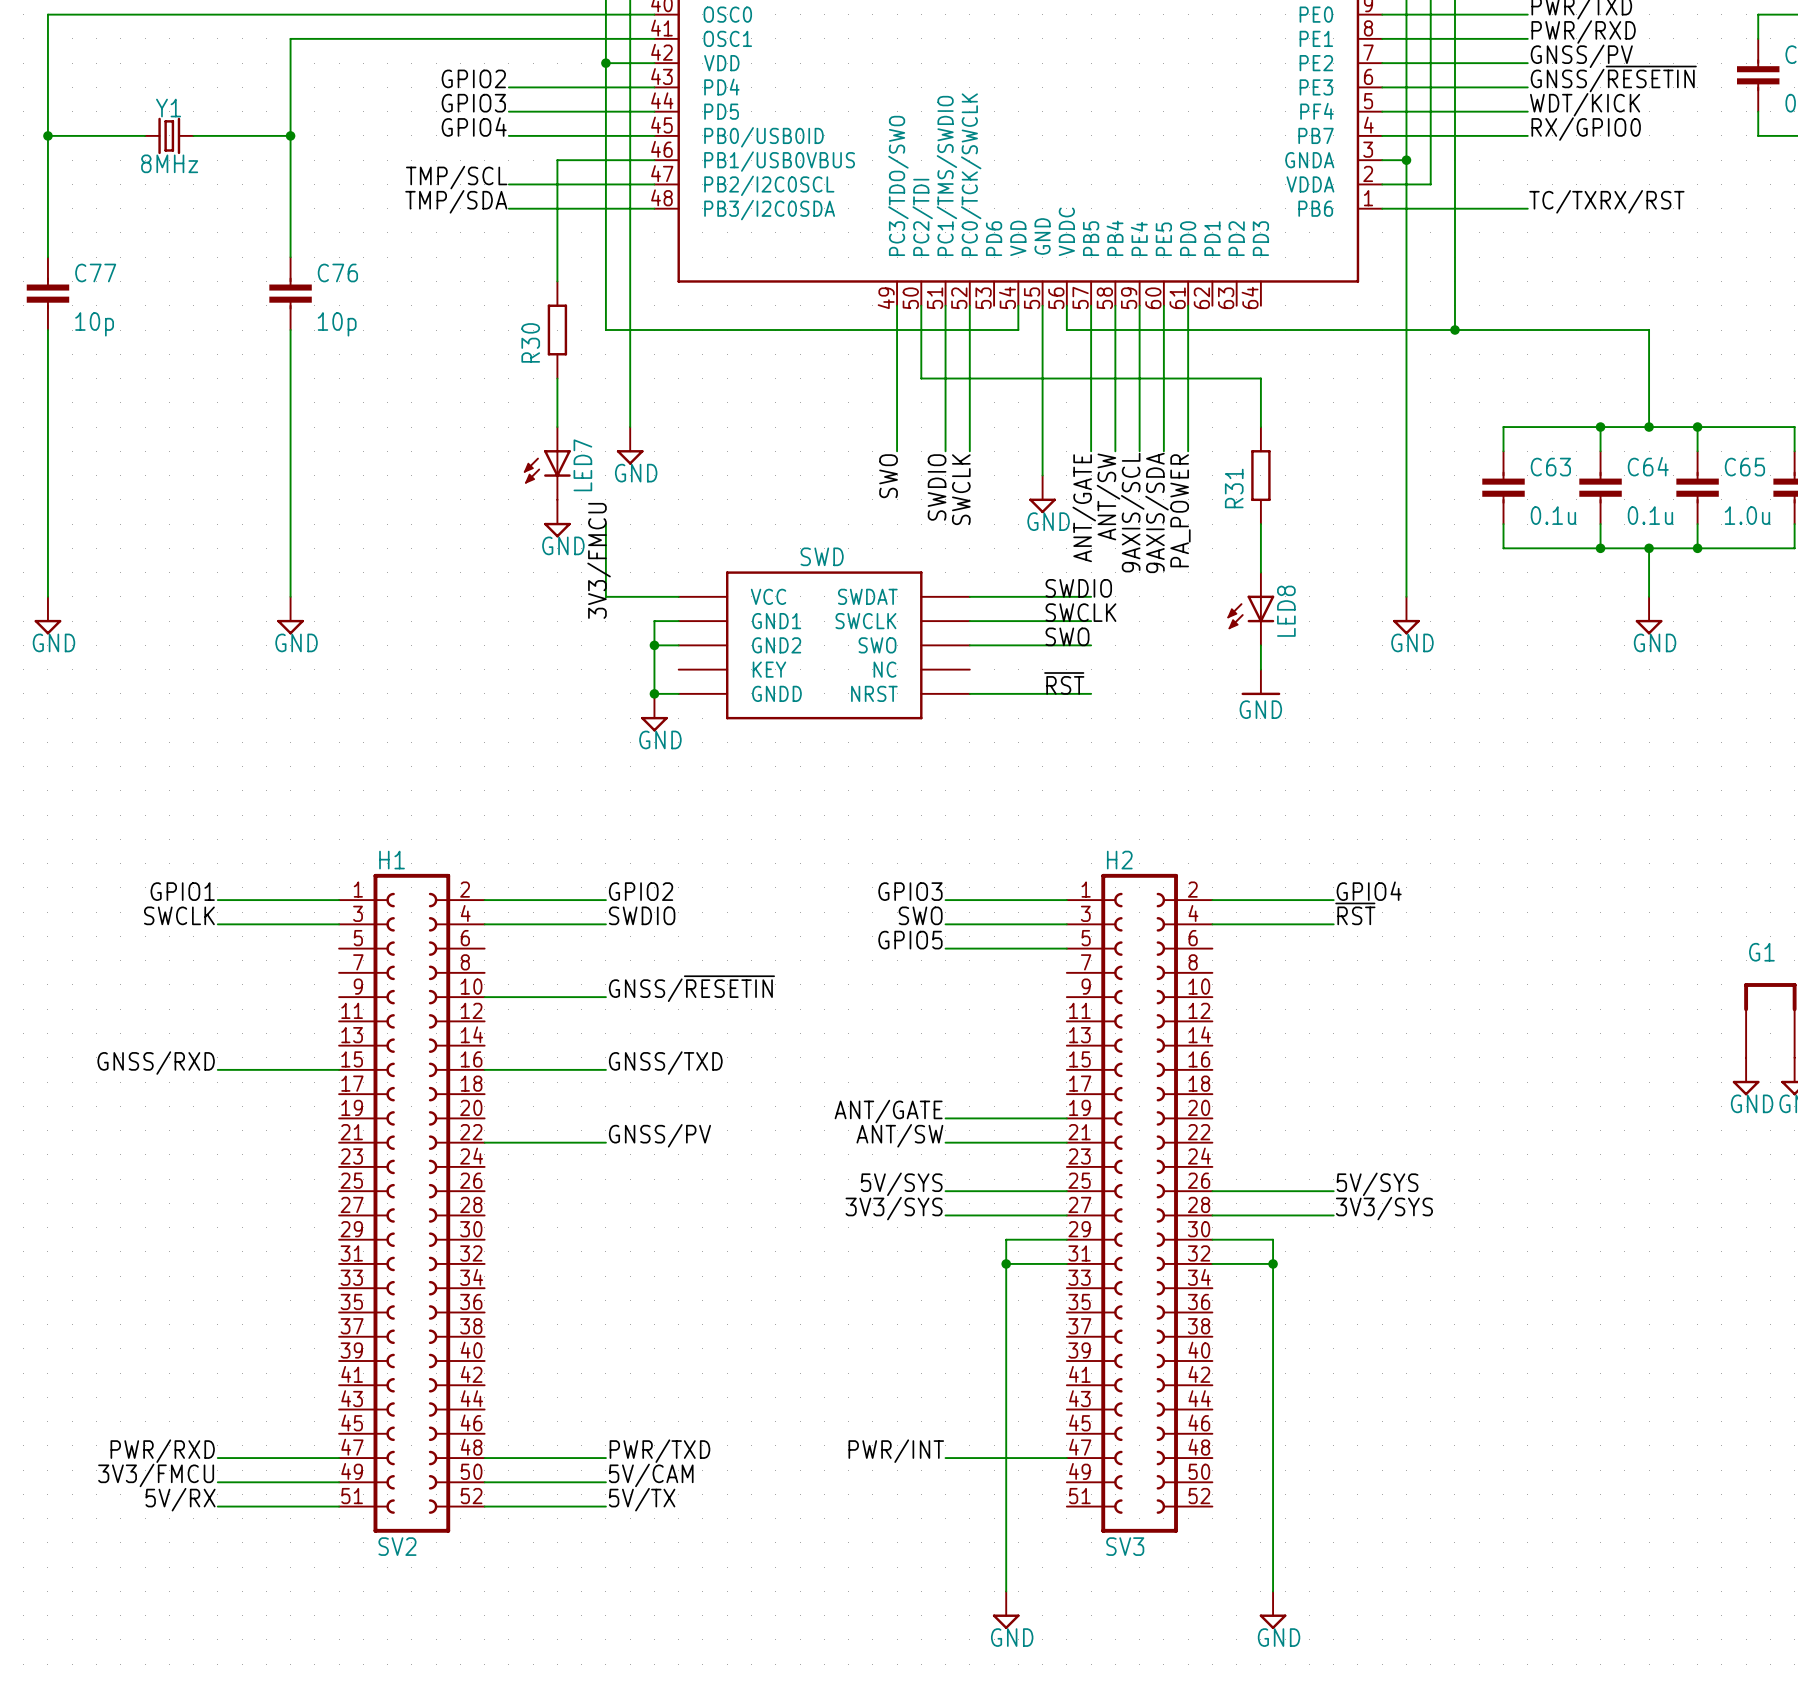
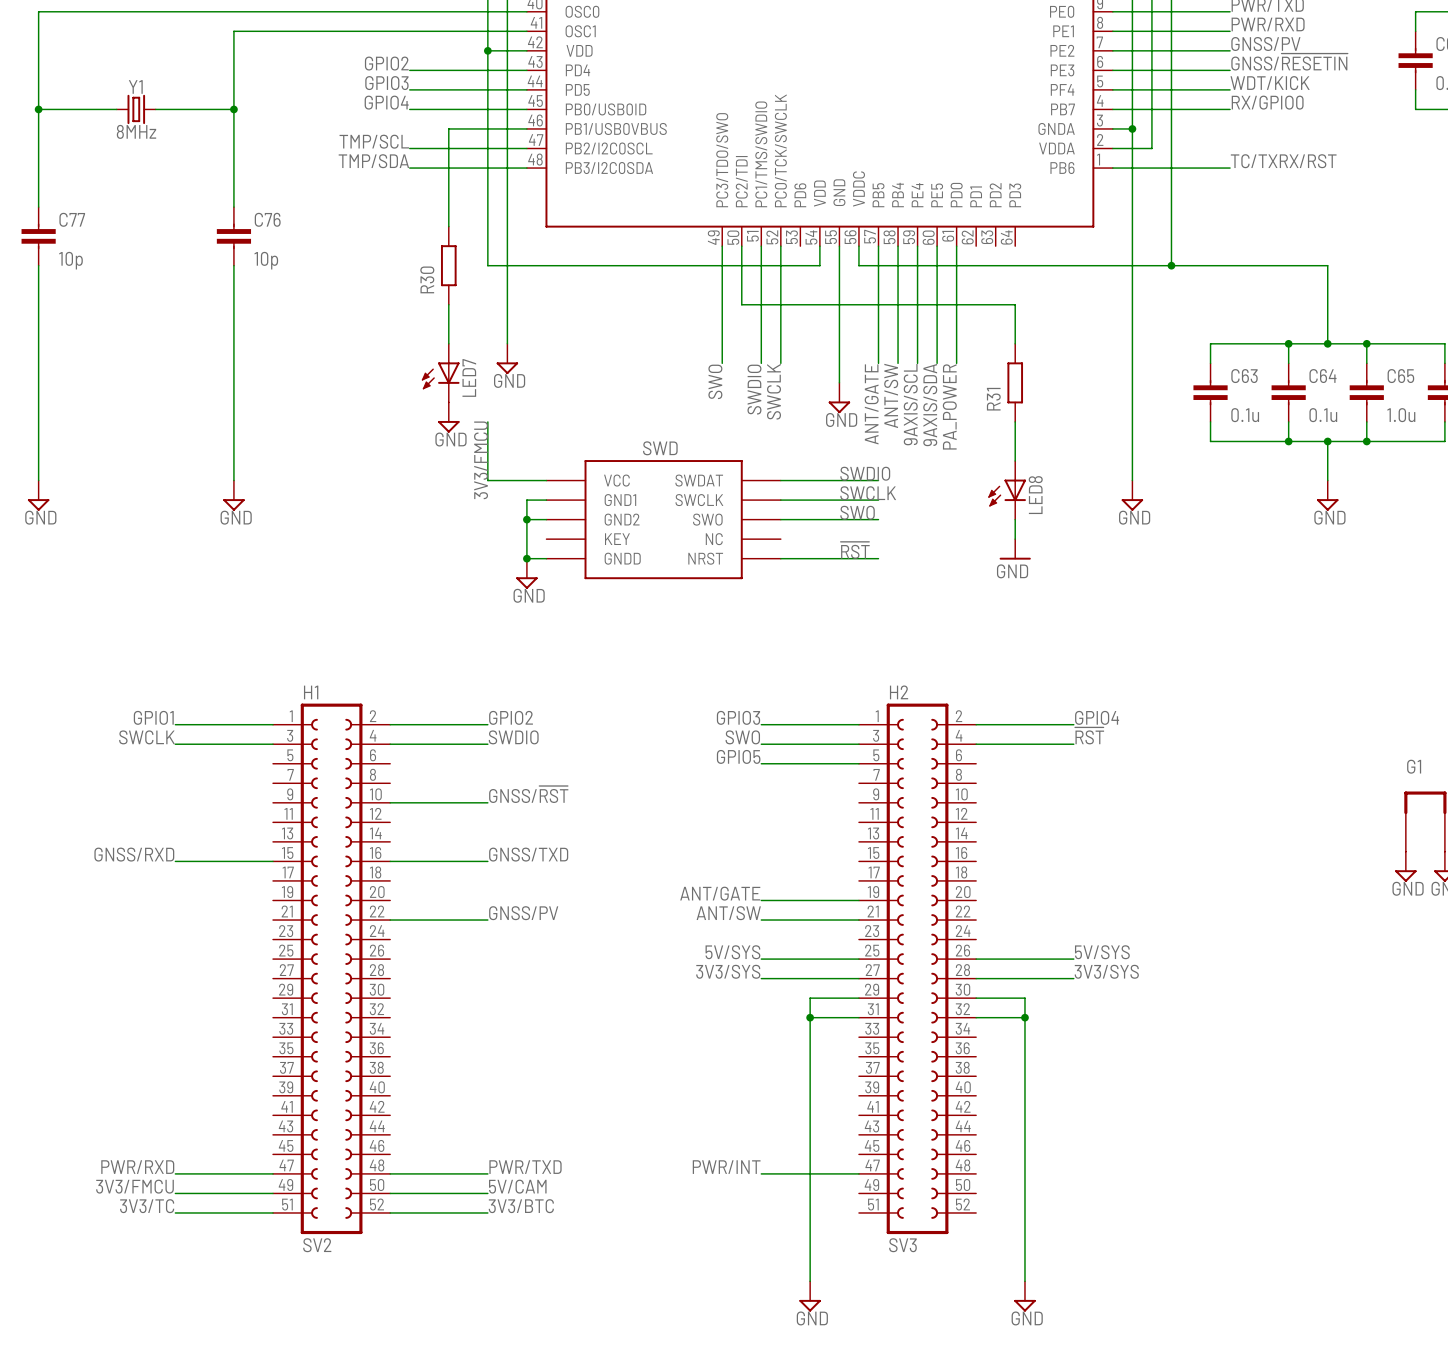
label: GNSS/~{RESETIN} (691, 988) -> GNSS/~{RST} (528, 794)
label: 5V/RX (180, 1499) -> 3V3/TC (147, 1206)
label: 5V/TX (642, 1499) -> 3V3/BTC (521, 1206)

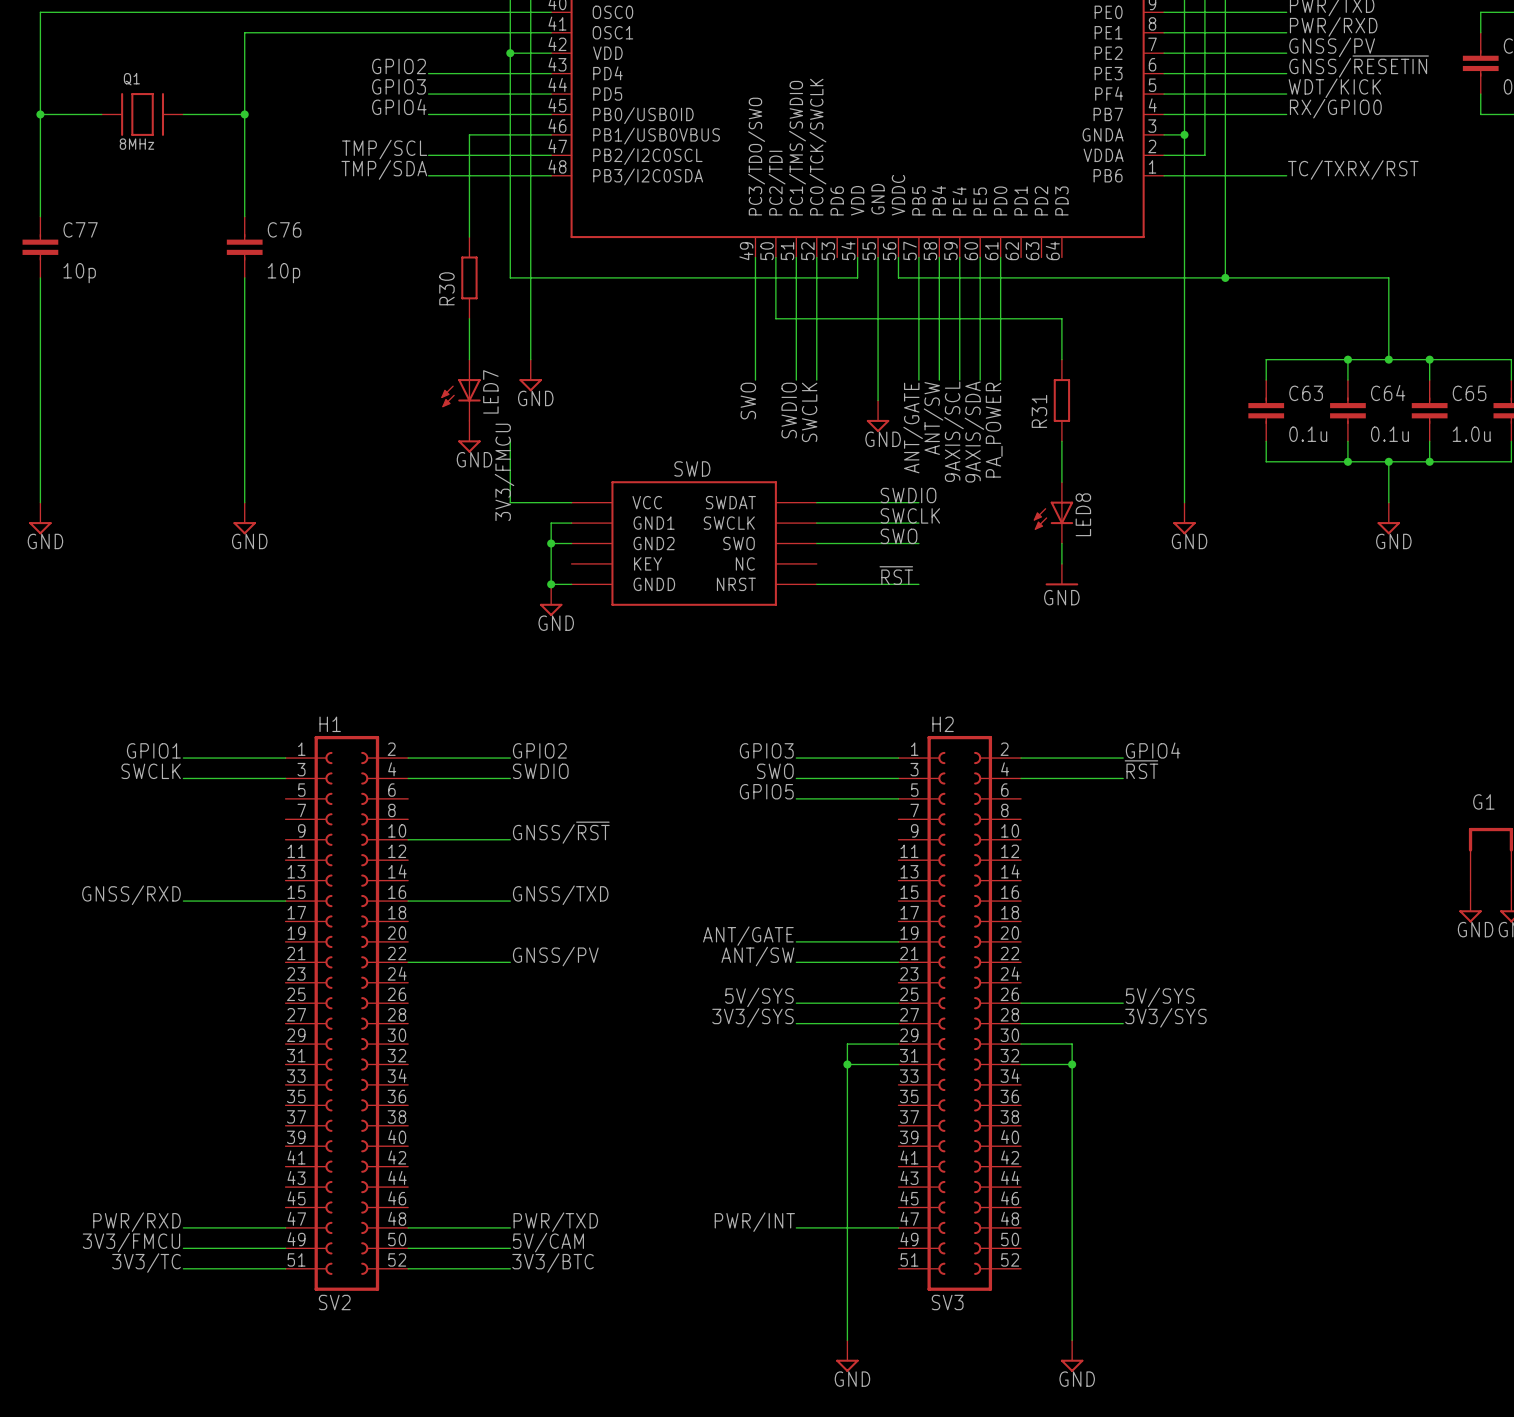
Y1: 8MHz (136, 109) -> none
Q1: none -> 8MHz (142, 114)

